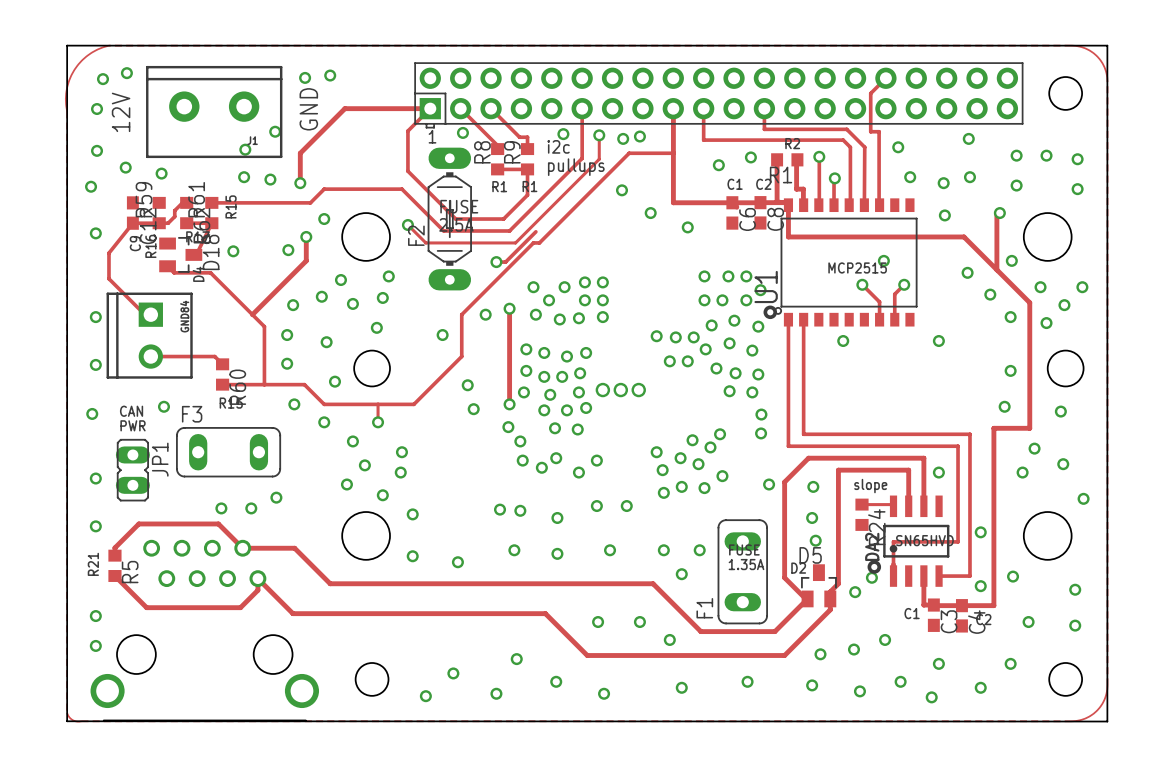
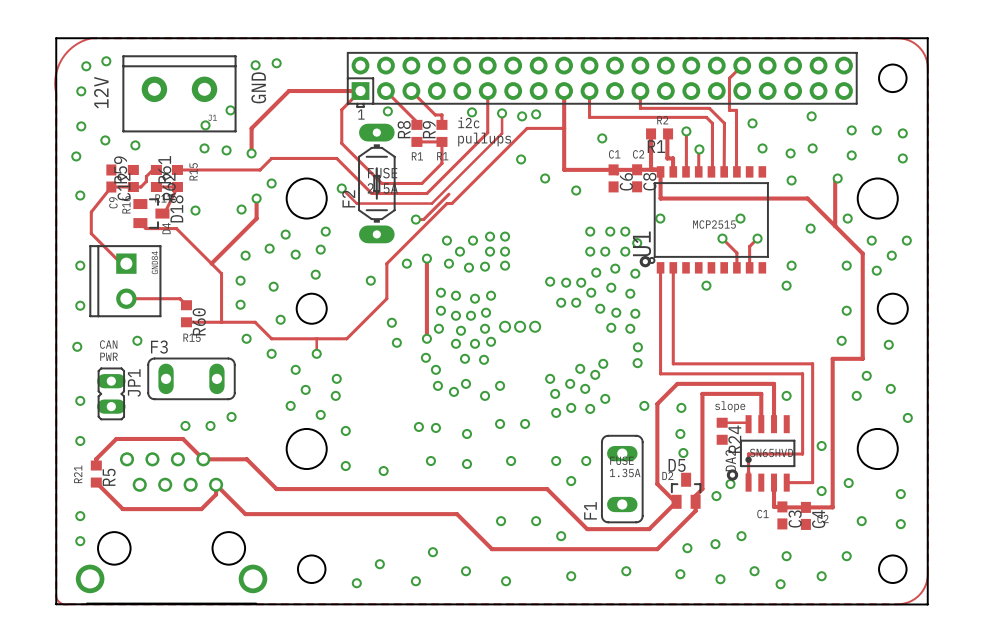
via: (750, 157) -> none
via: none -> (660, 218)
via position: (990, 294) -> (791, 265)

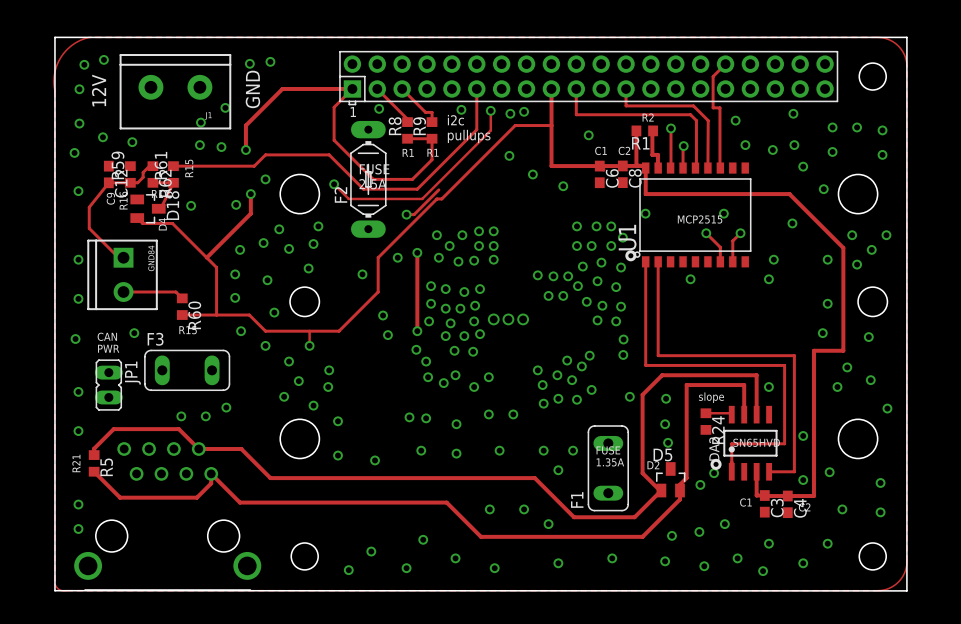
via: none -> (803, 166)
track: (837, 178) (835, 178) (835, 226) -> none
via: (837, 178) -> none
via: (791, 180) -> none
via: none -> (823, 189)
via: (847, 218) -> none

